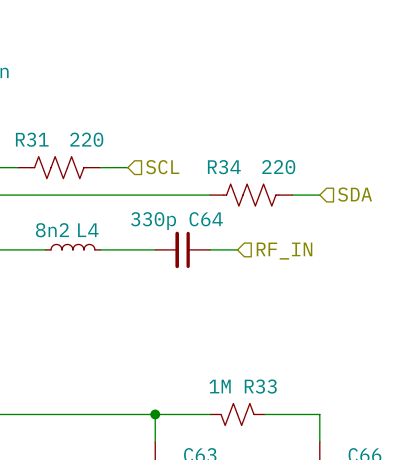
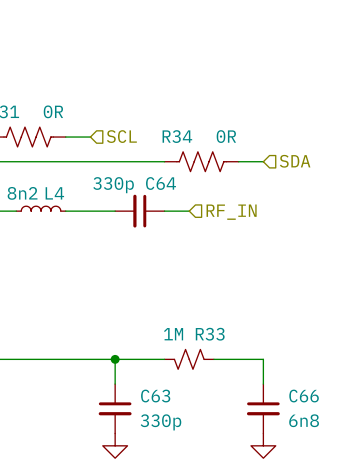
R31 value: 220 (86, 139) -> 0R (53, 111)
R34 value: 220 (278, 167) -> 0R (226, 136)

